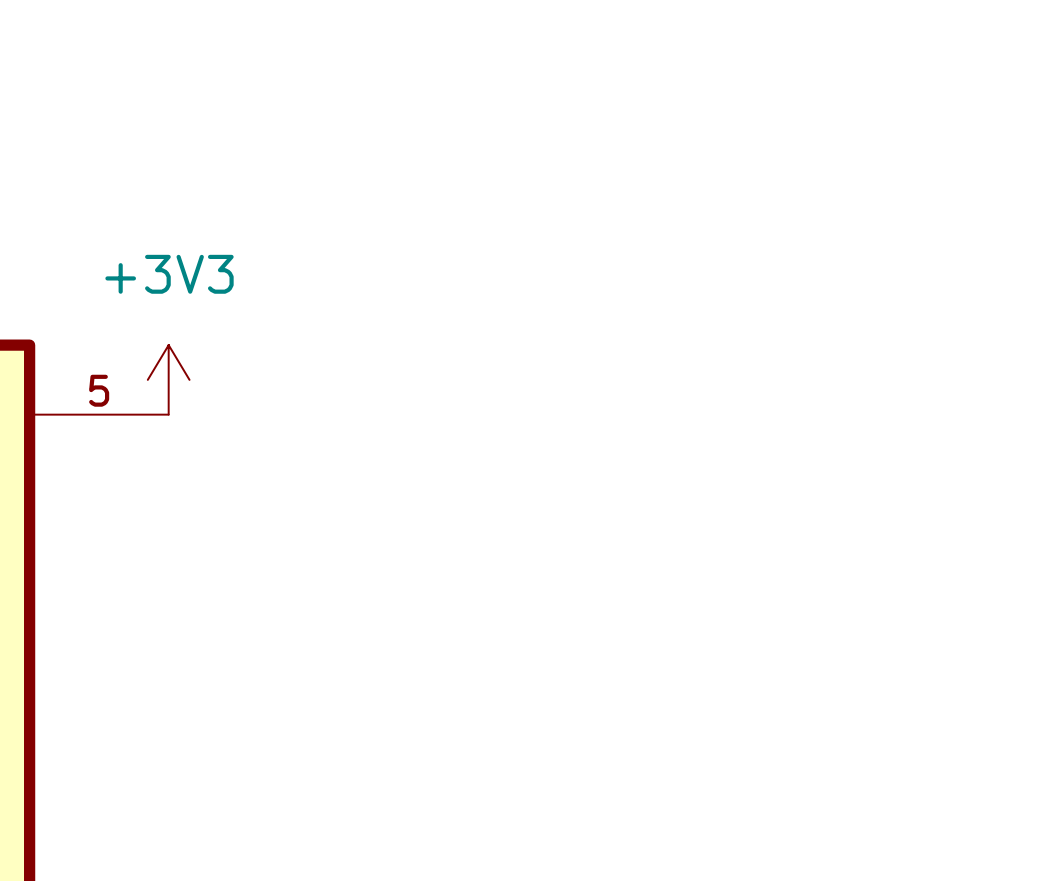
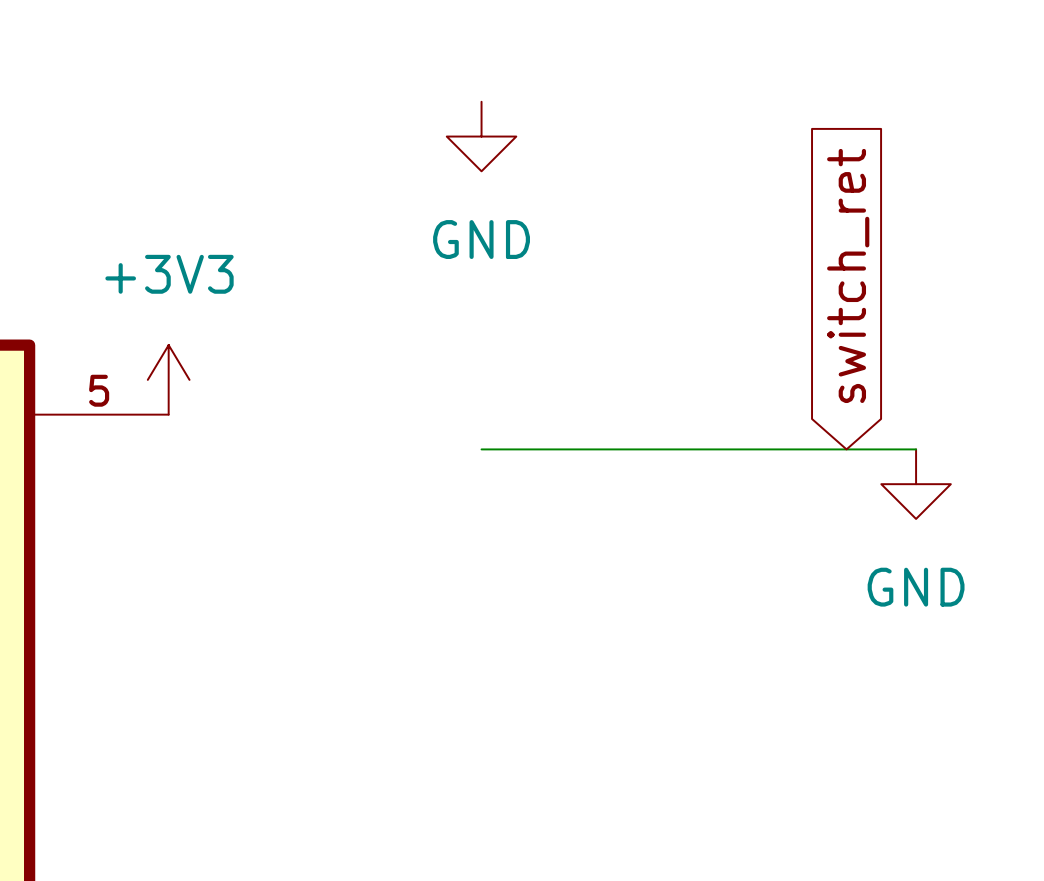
power symbol: none -> GND (481, 136)
global label: none -> switch_ret (848, 275)
wire: none -> (481, 449) (916, 449)
power symbol: none -> GND (916, 484)

